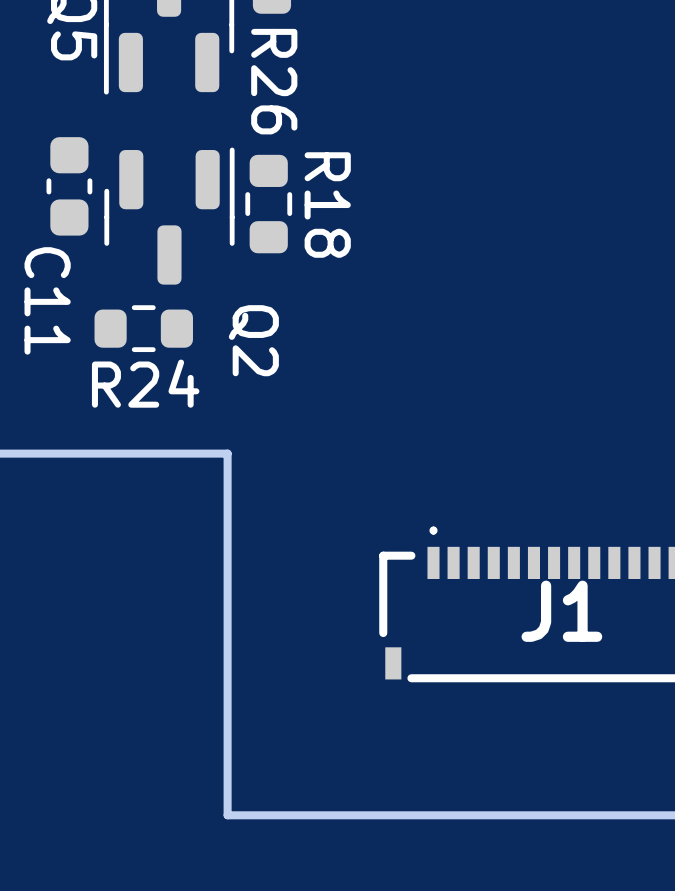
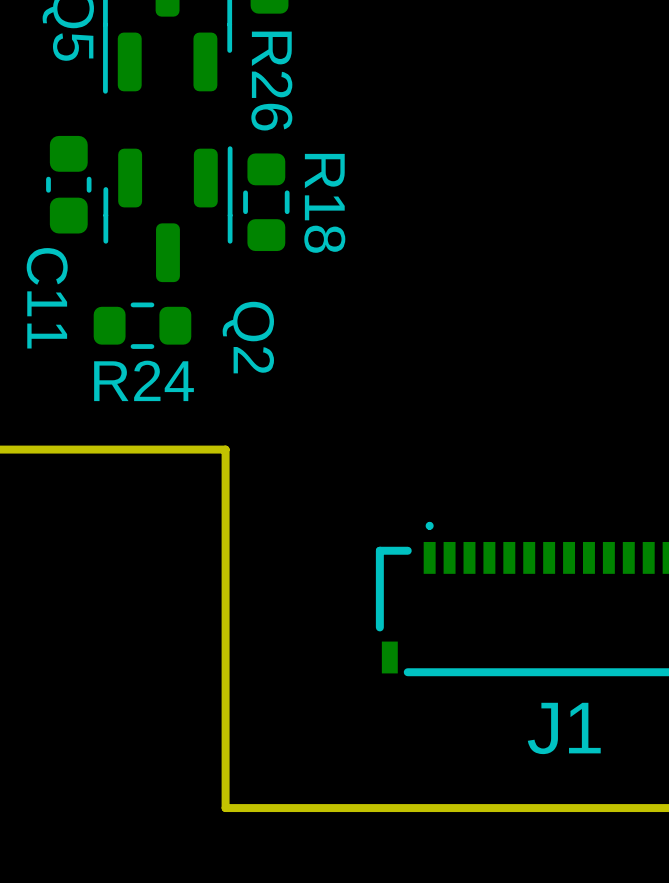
J1 name position: J1 (561, 611) -> J1 (564, 728)

